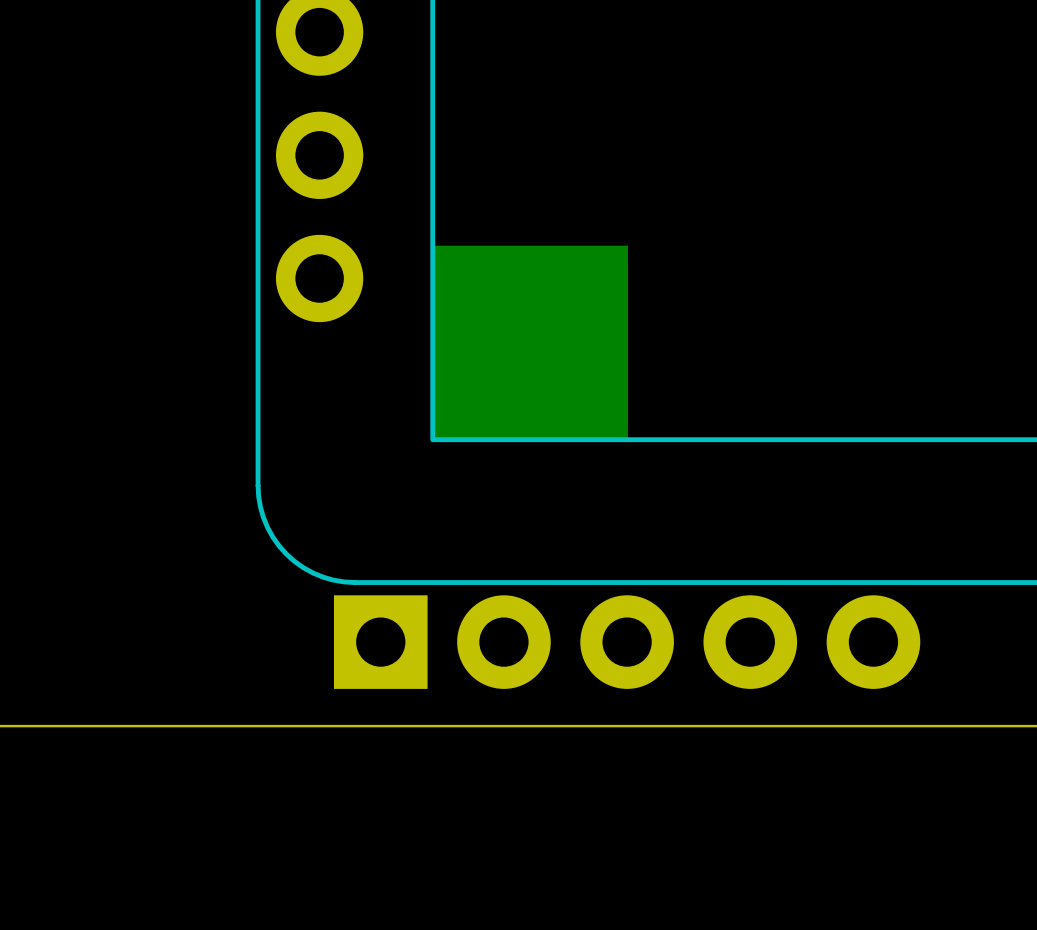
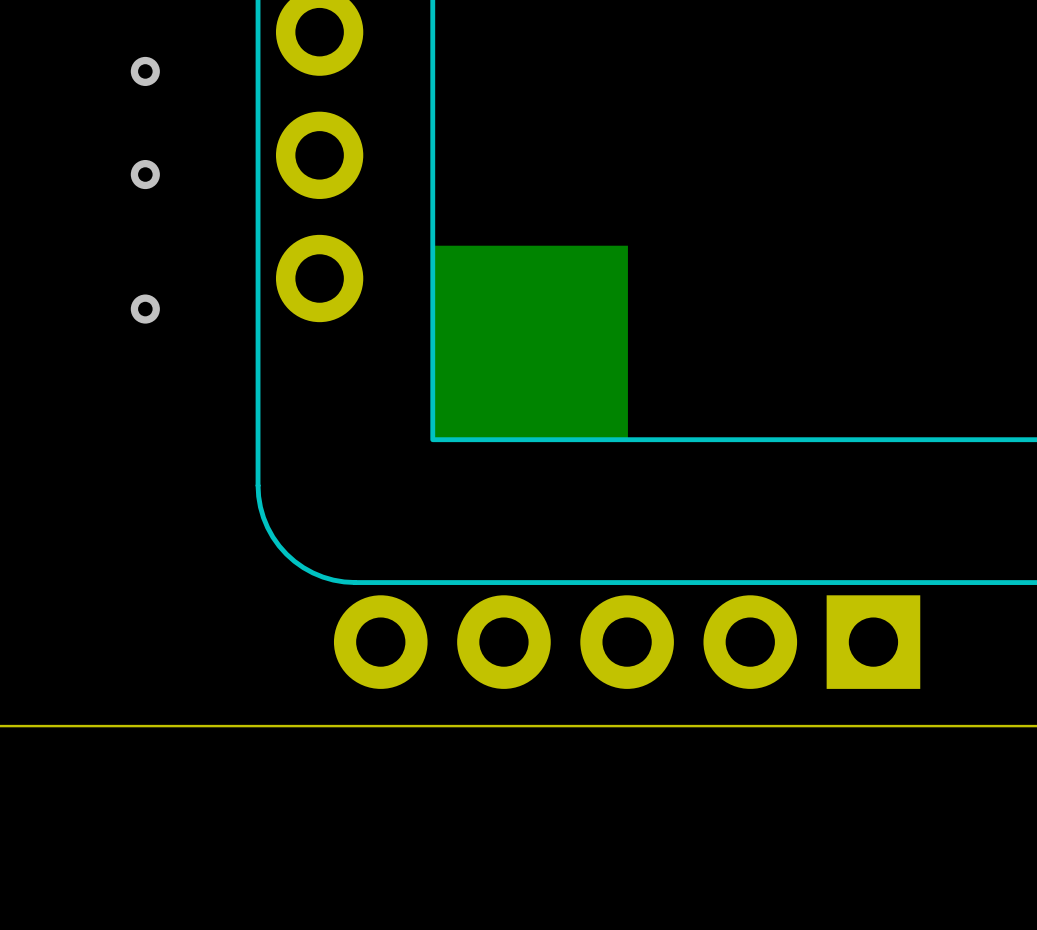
via: none -> (145, 71)
via: none -> (145, 174)
via: none -> (145, 309)
part rotation: 0° (627, 642) -> 180° (627, 642)

